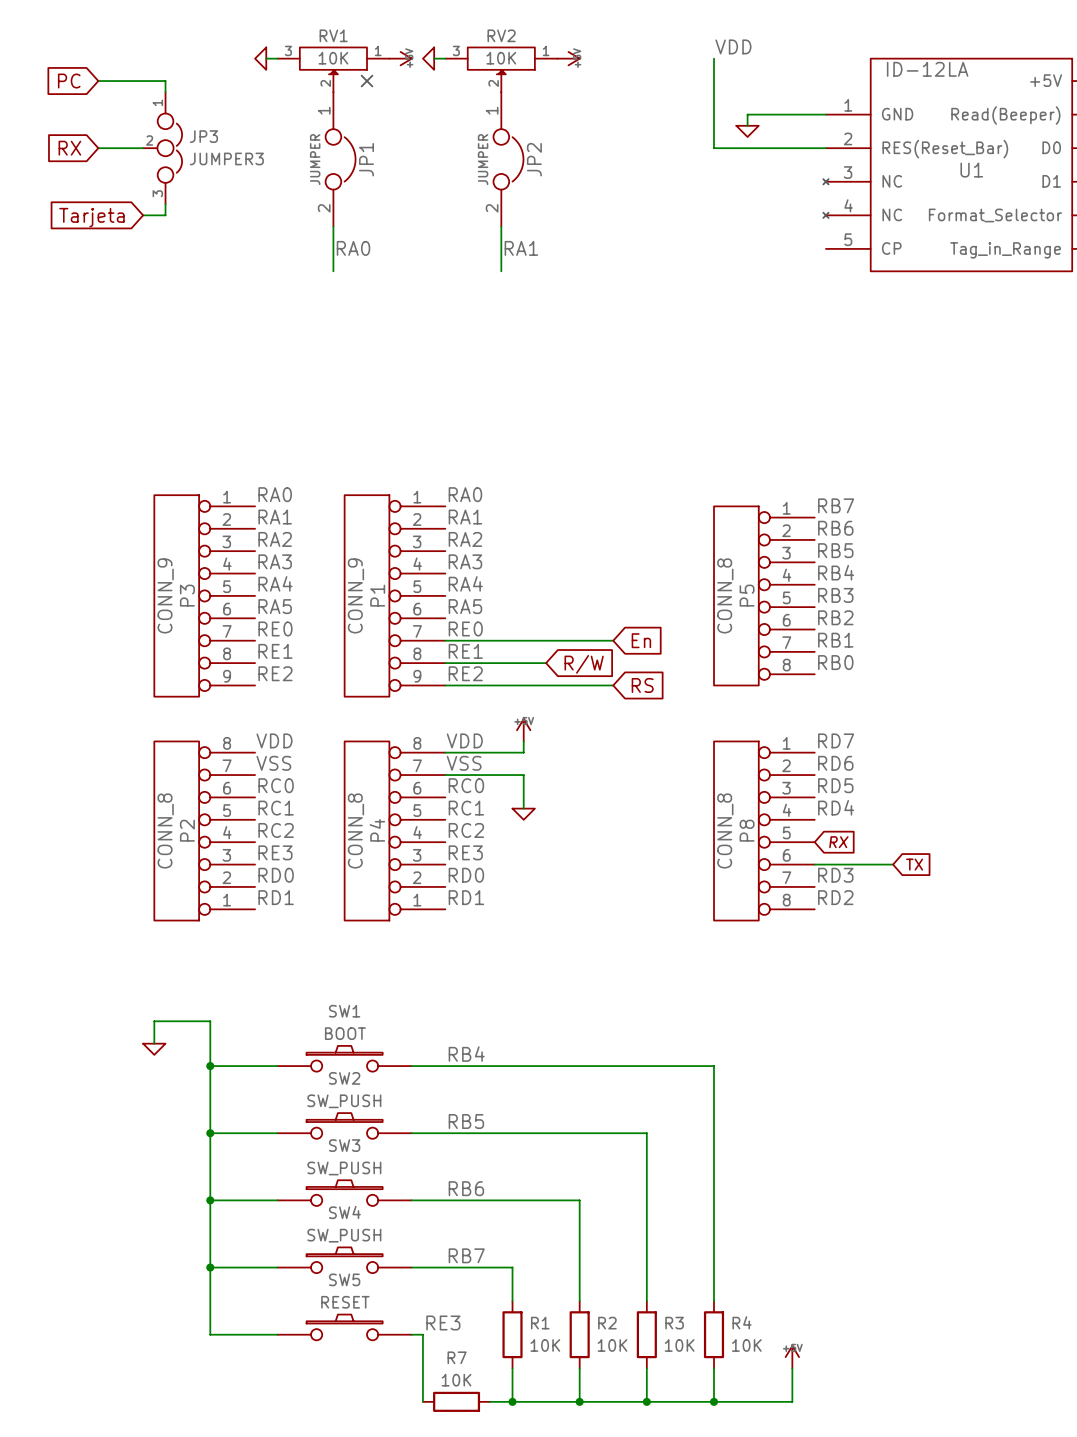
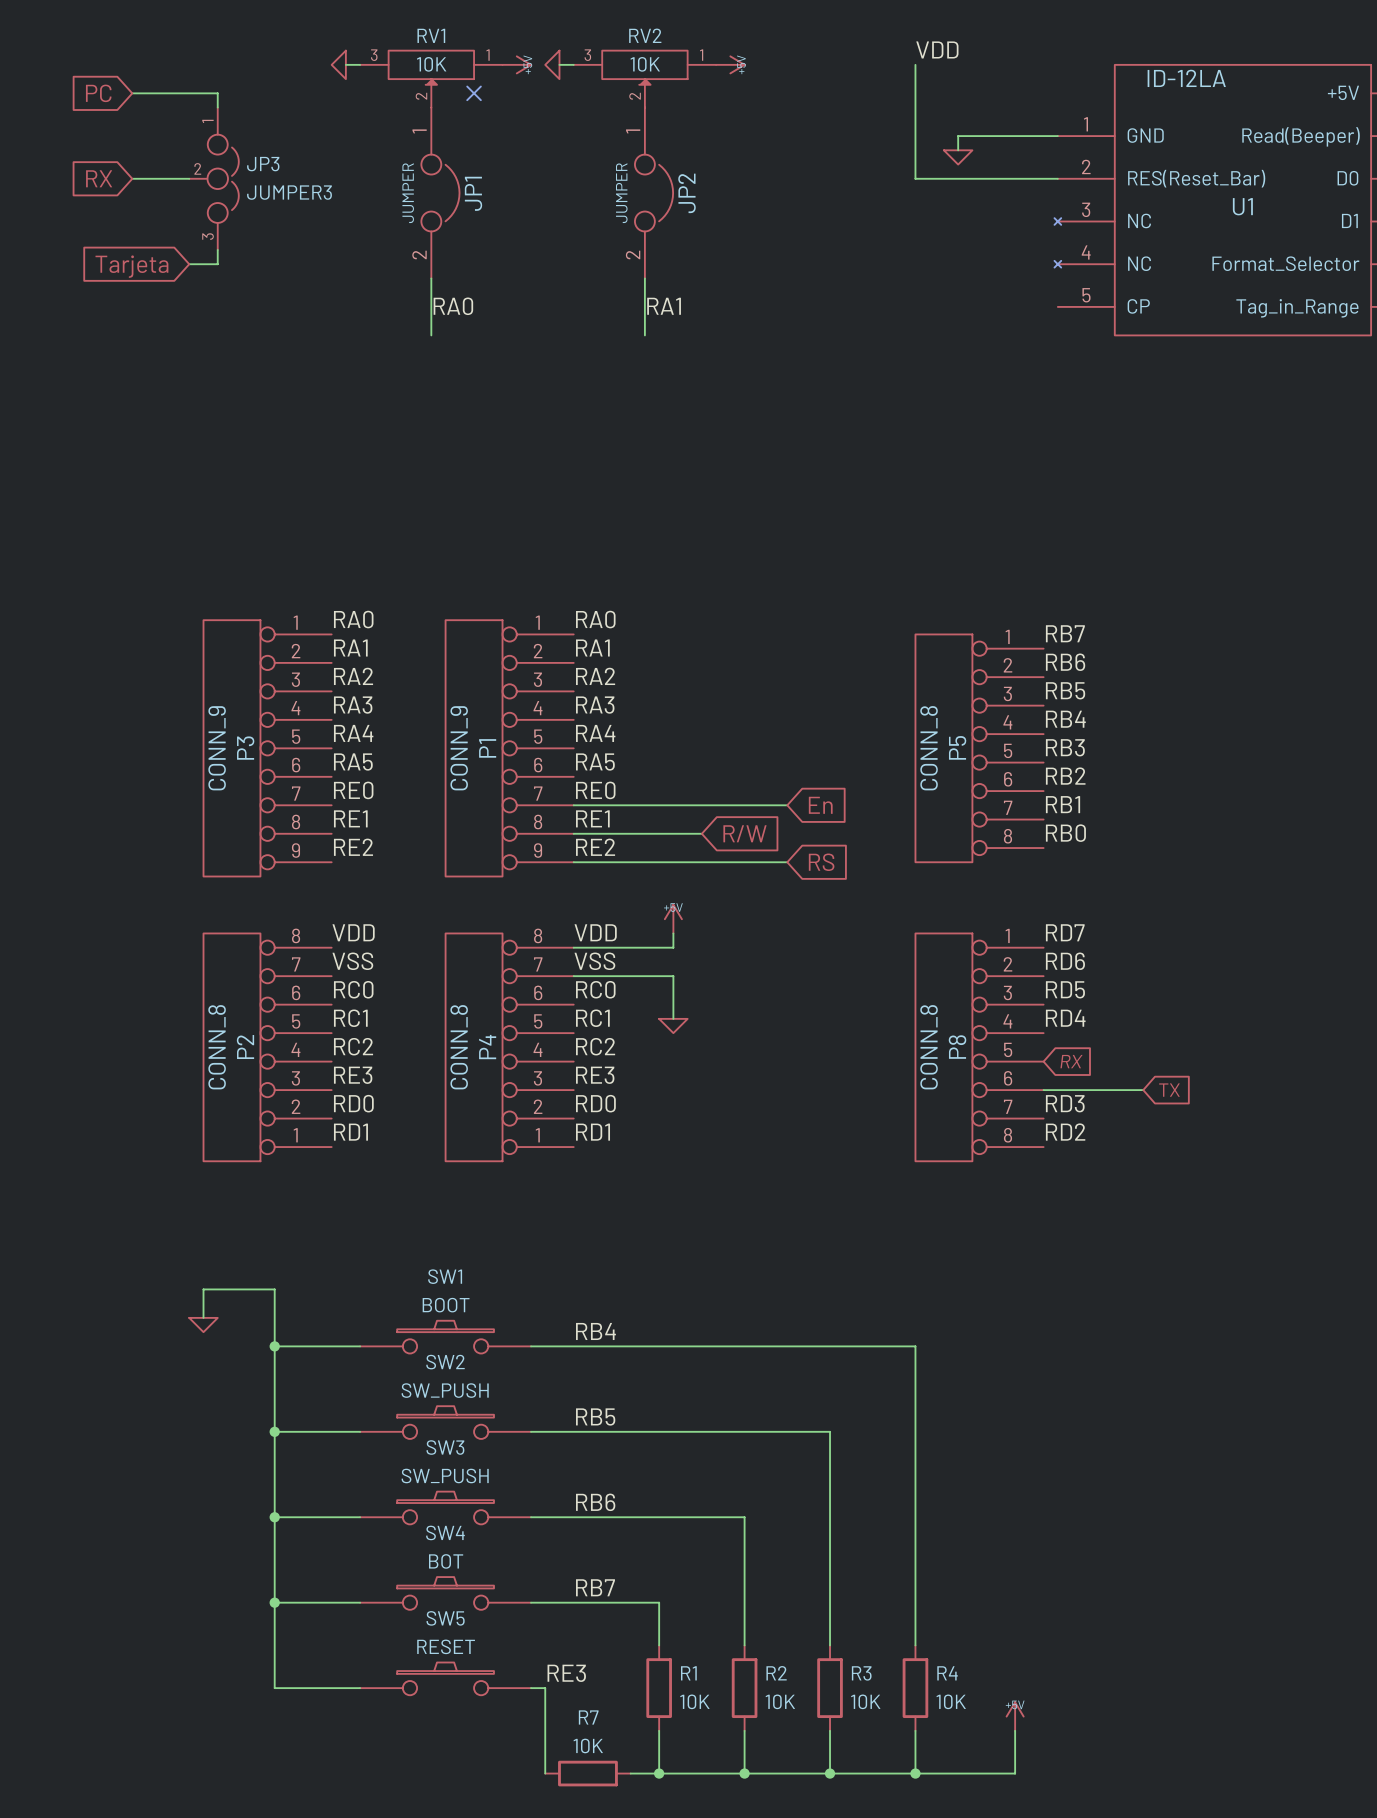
SW4 value: SW_PUSH (344, 1235) -> BOT (446, 1561)

